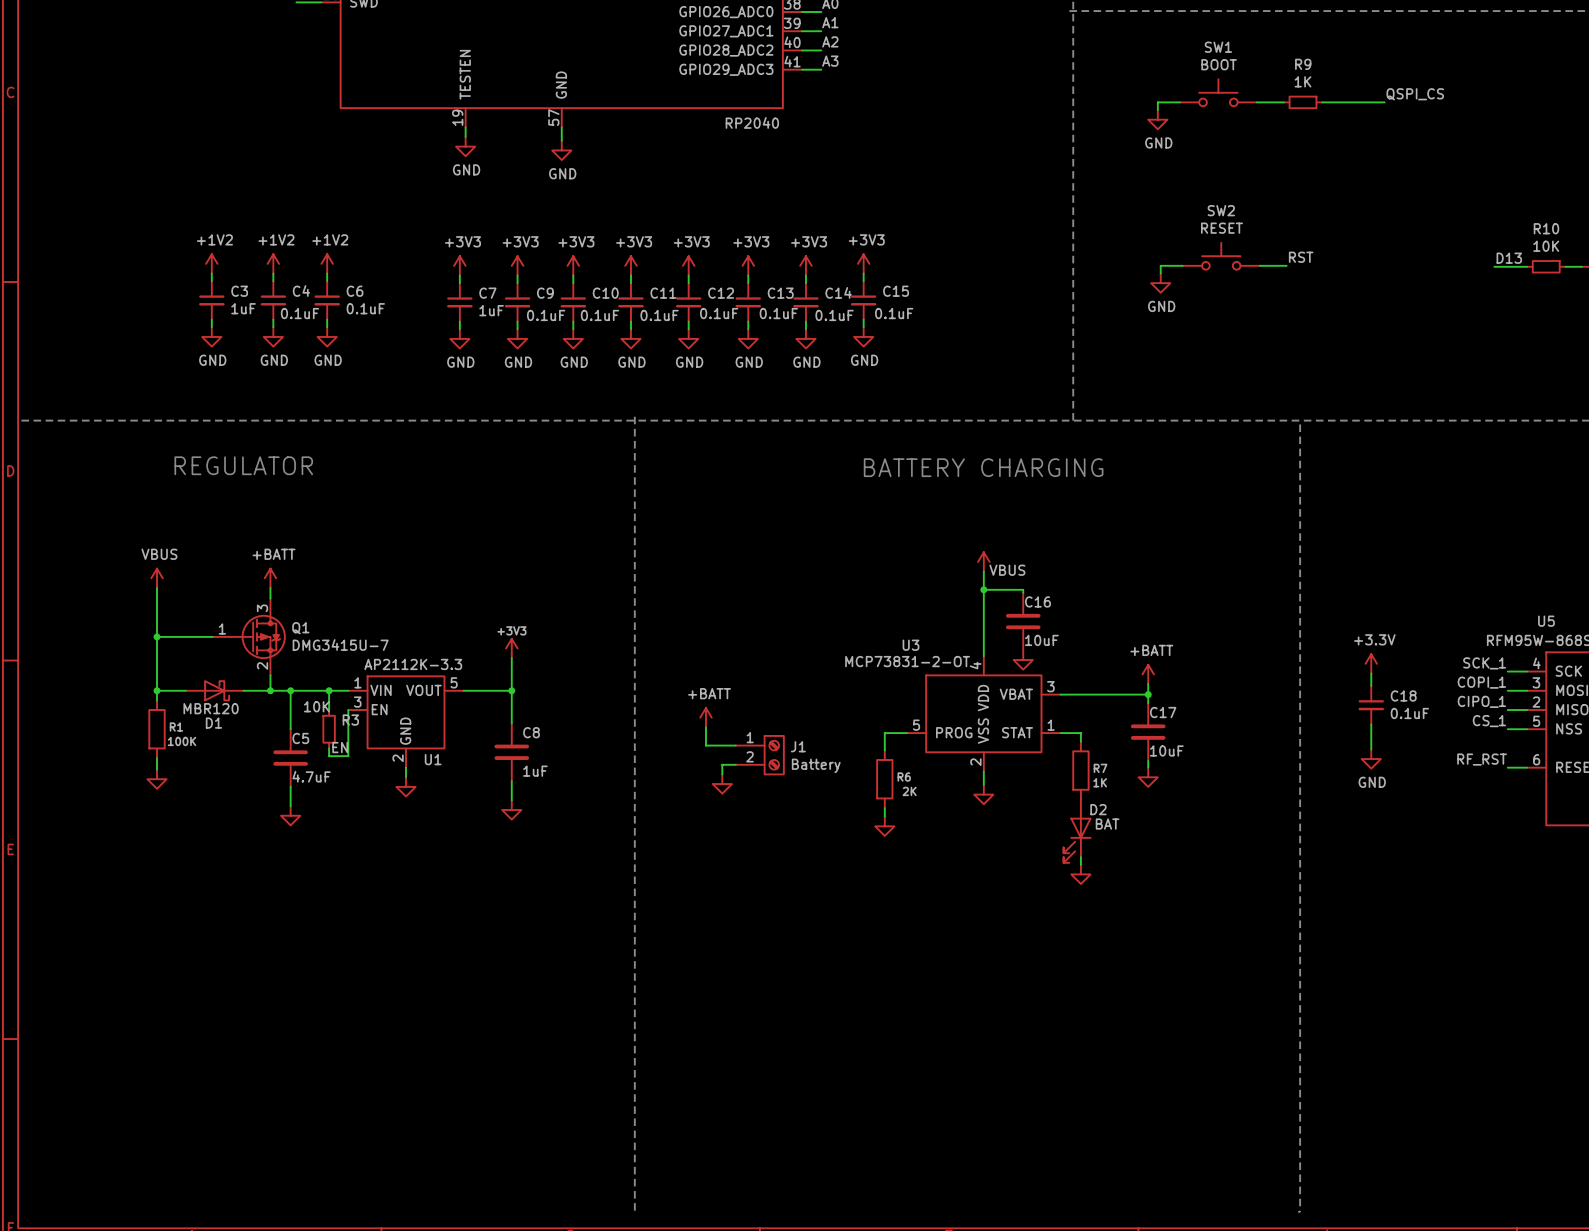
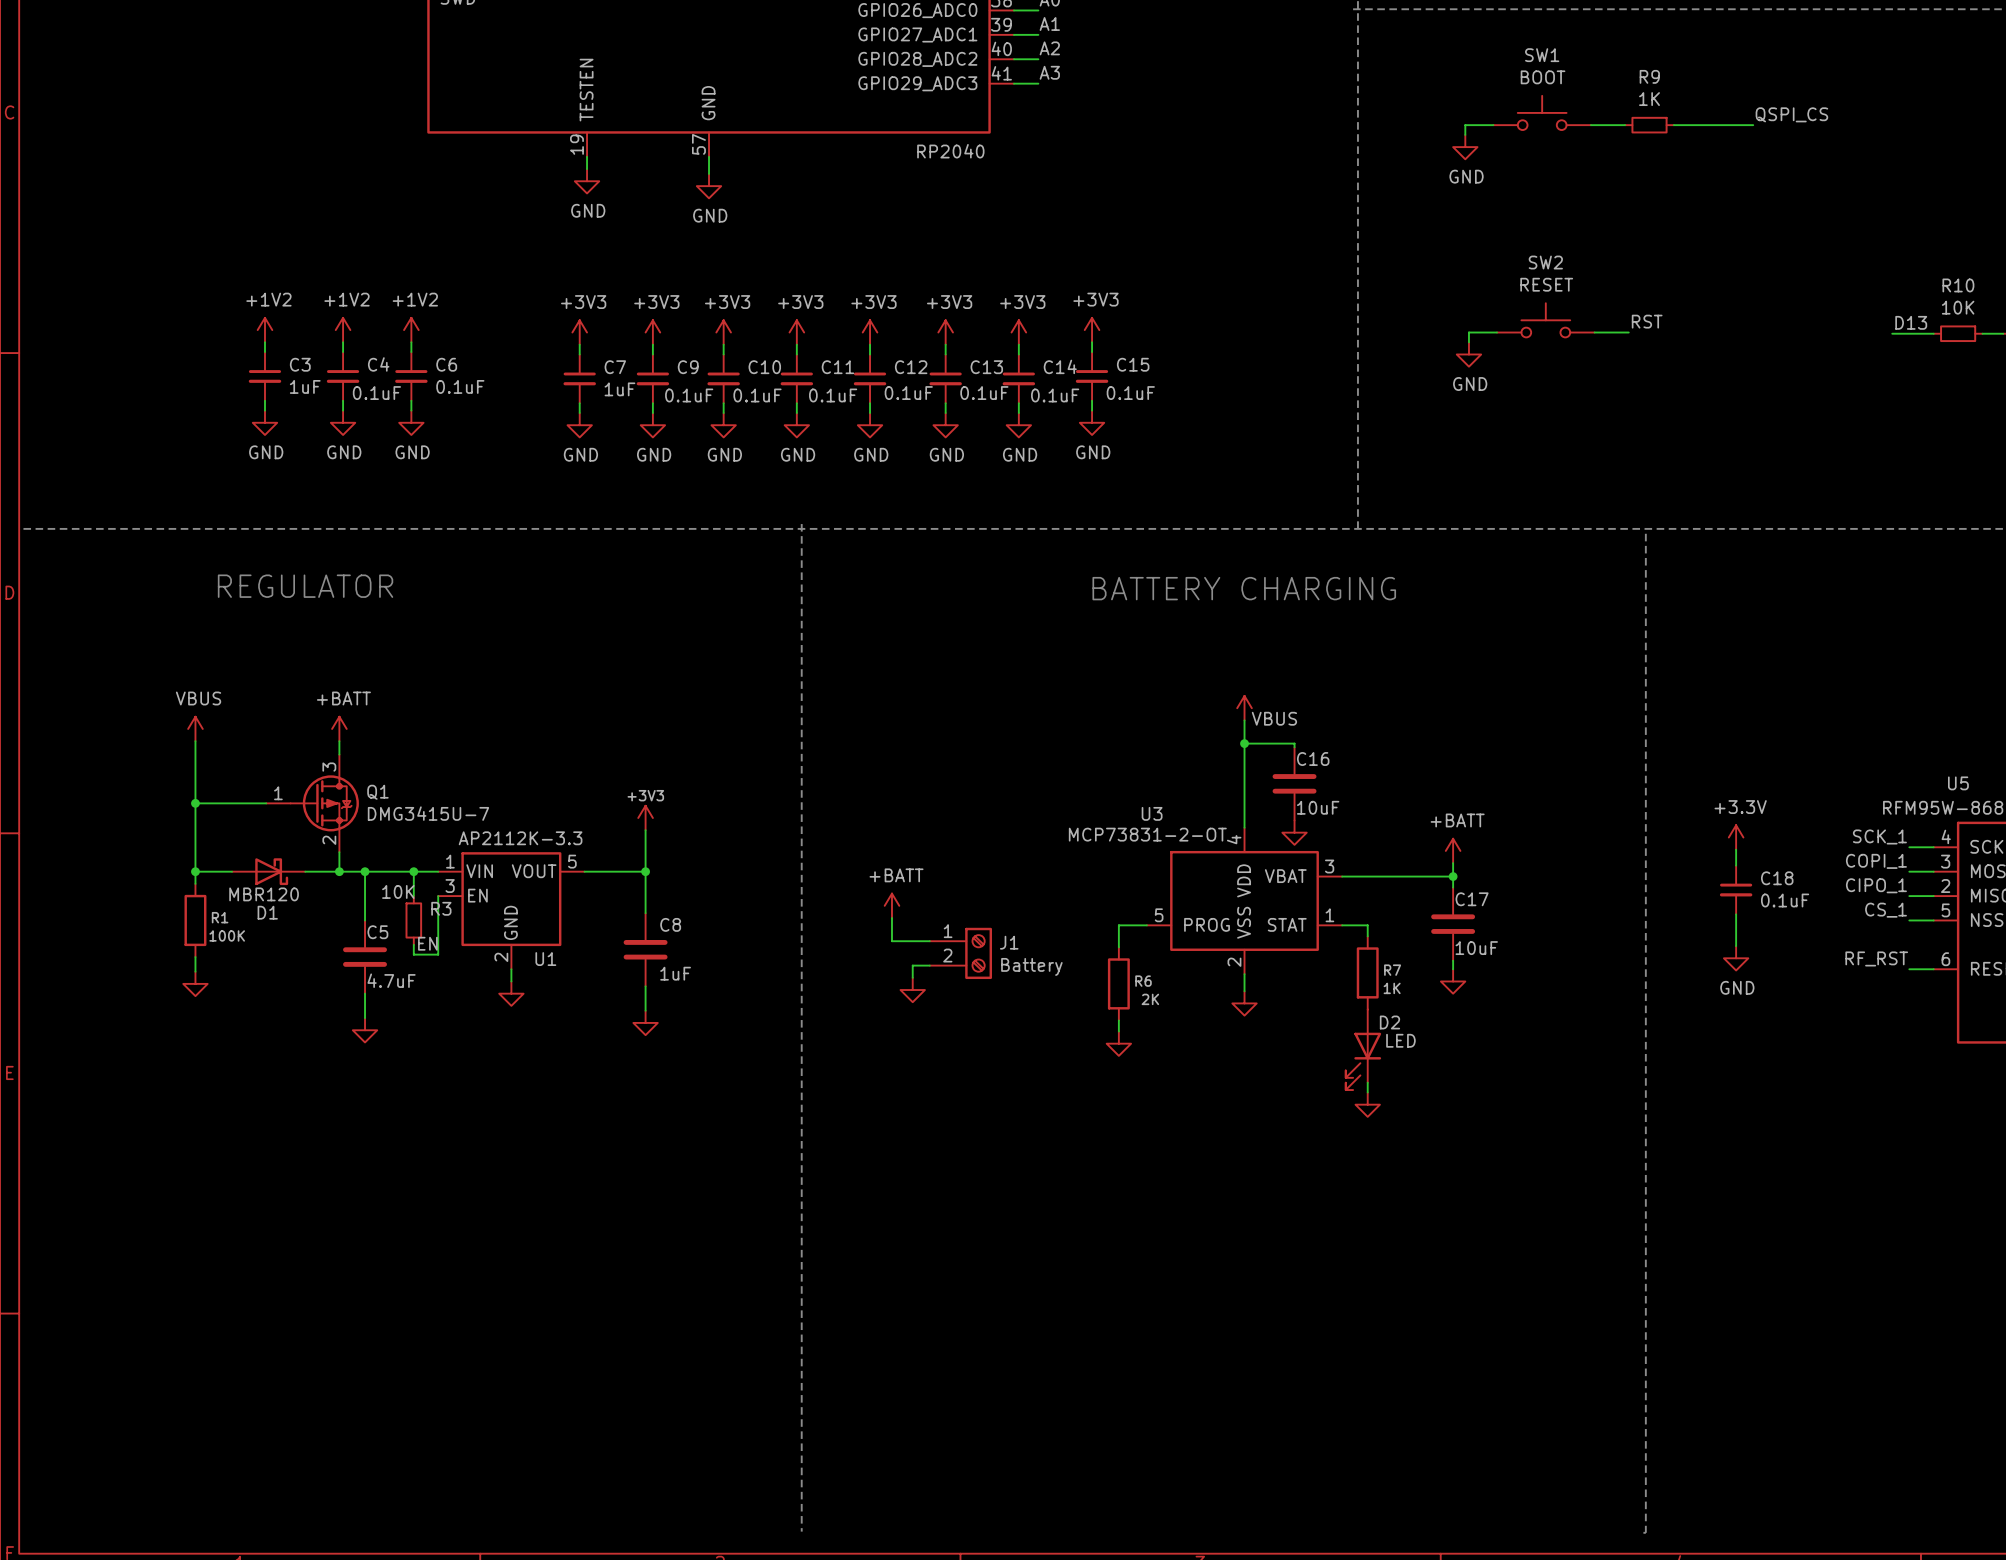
D2 value: BAT (1107, 824) -> LED (1400, 1040)

